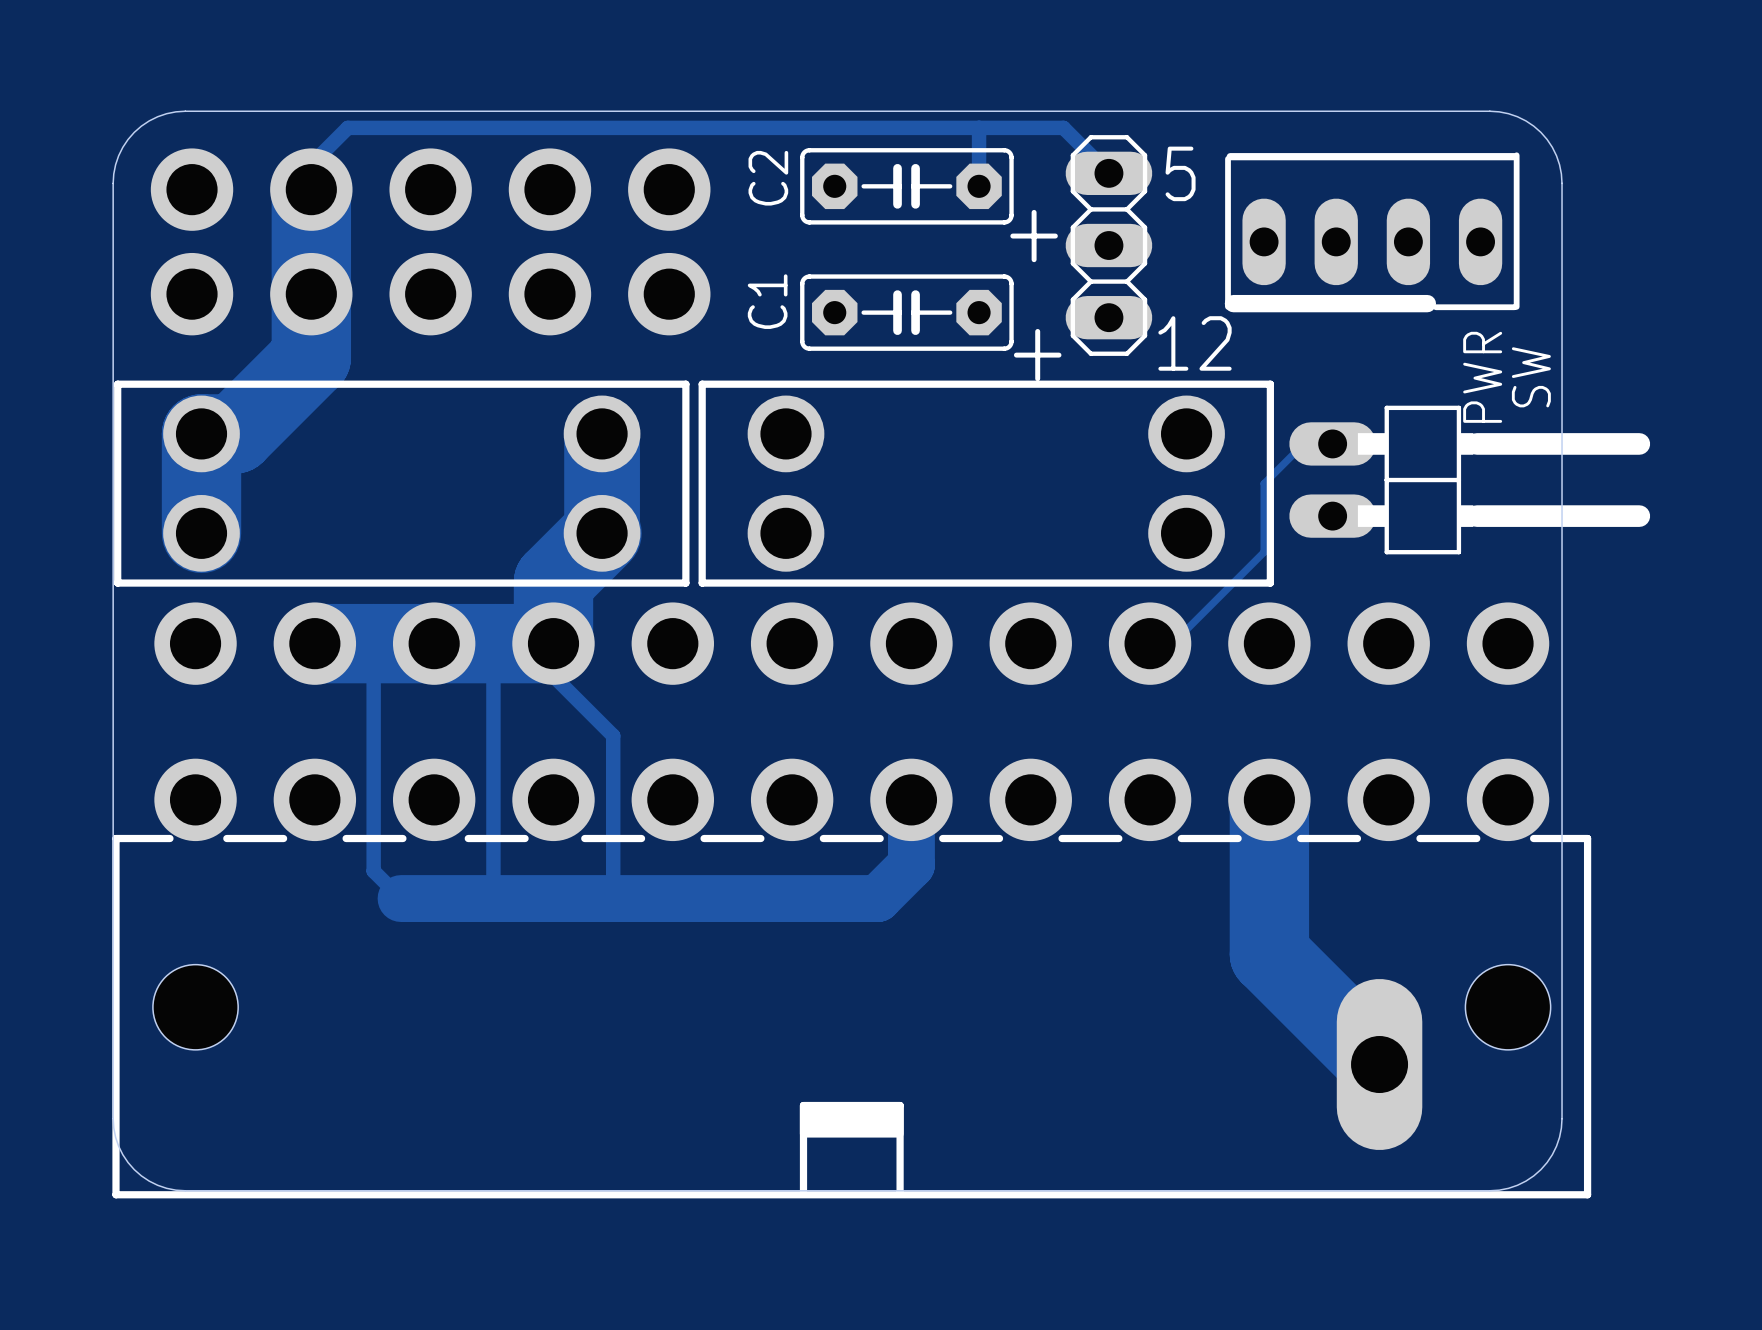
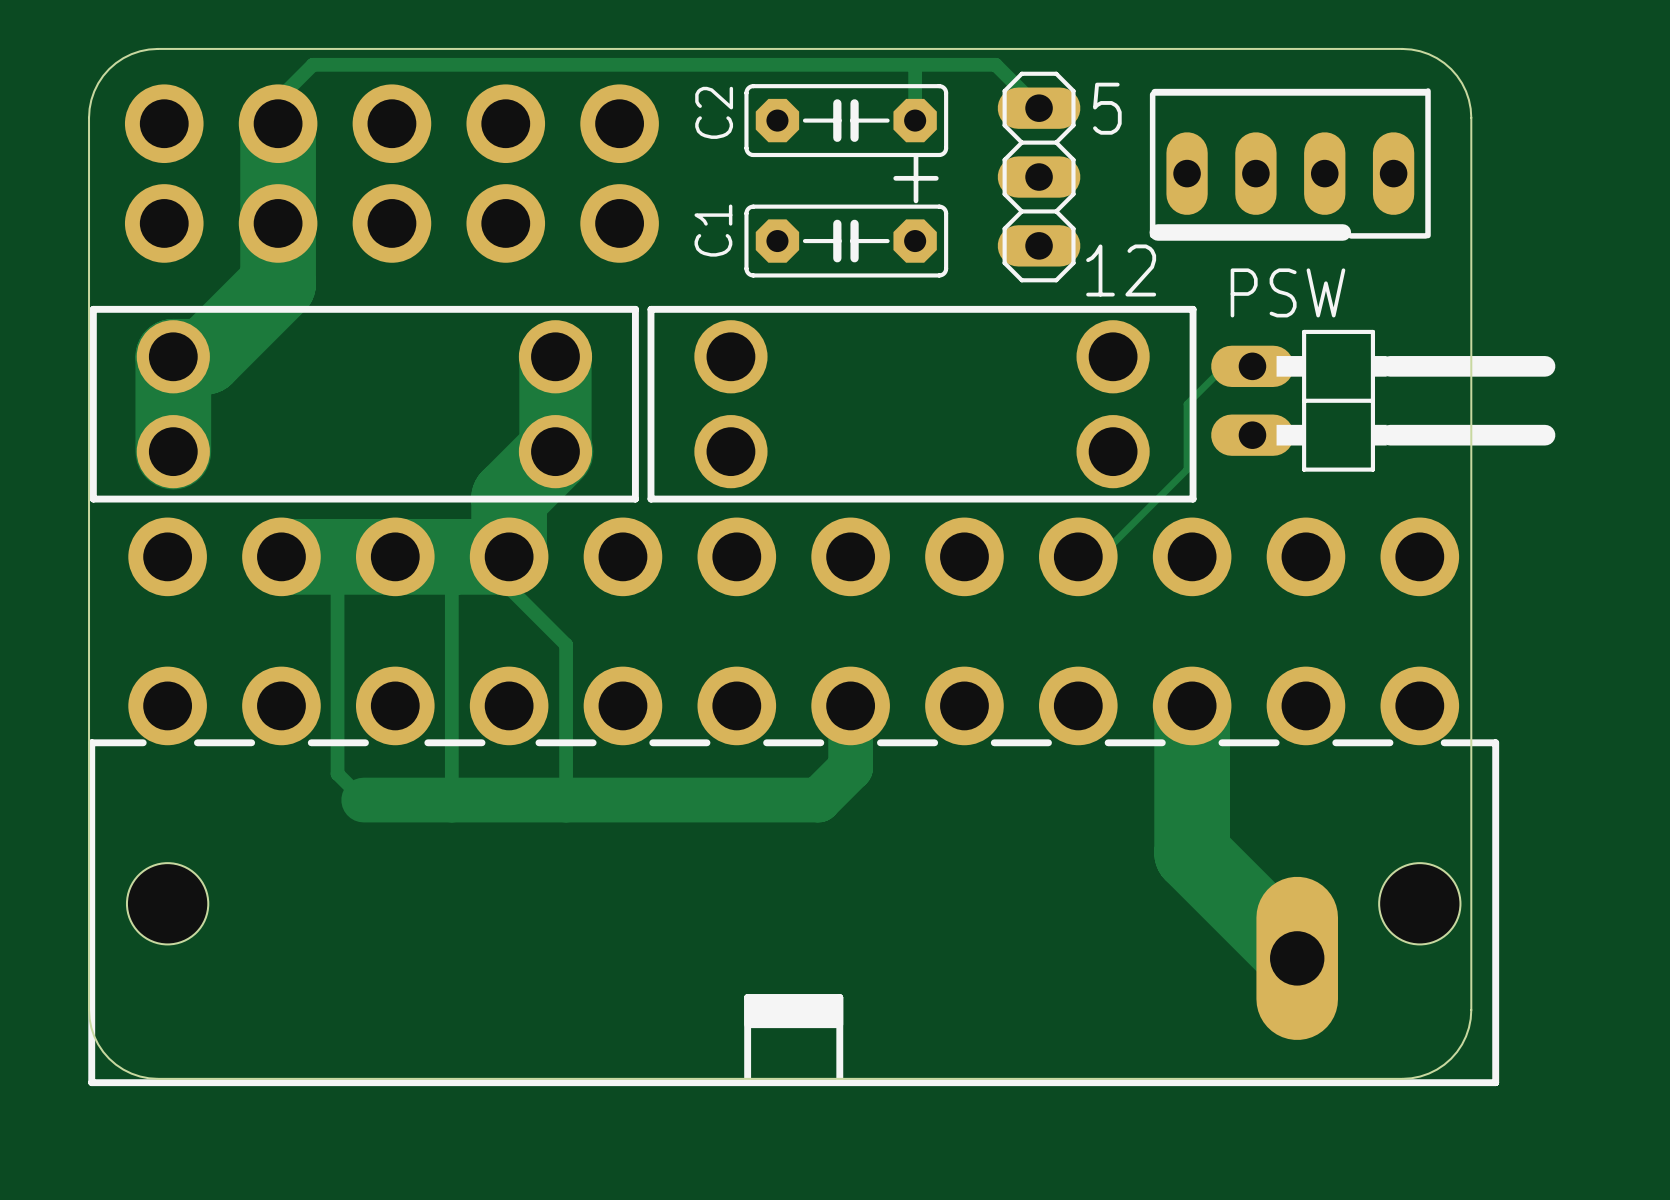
text position: + (1034, 236) -> + (916, 178)
text: + (1037, 355) -> none
text: PWR (1482, 377) -> PSW (1287, 292)
text: SW (1531, 377) -> none

